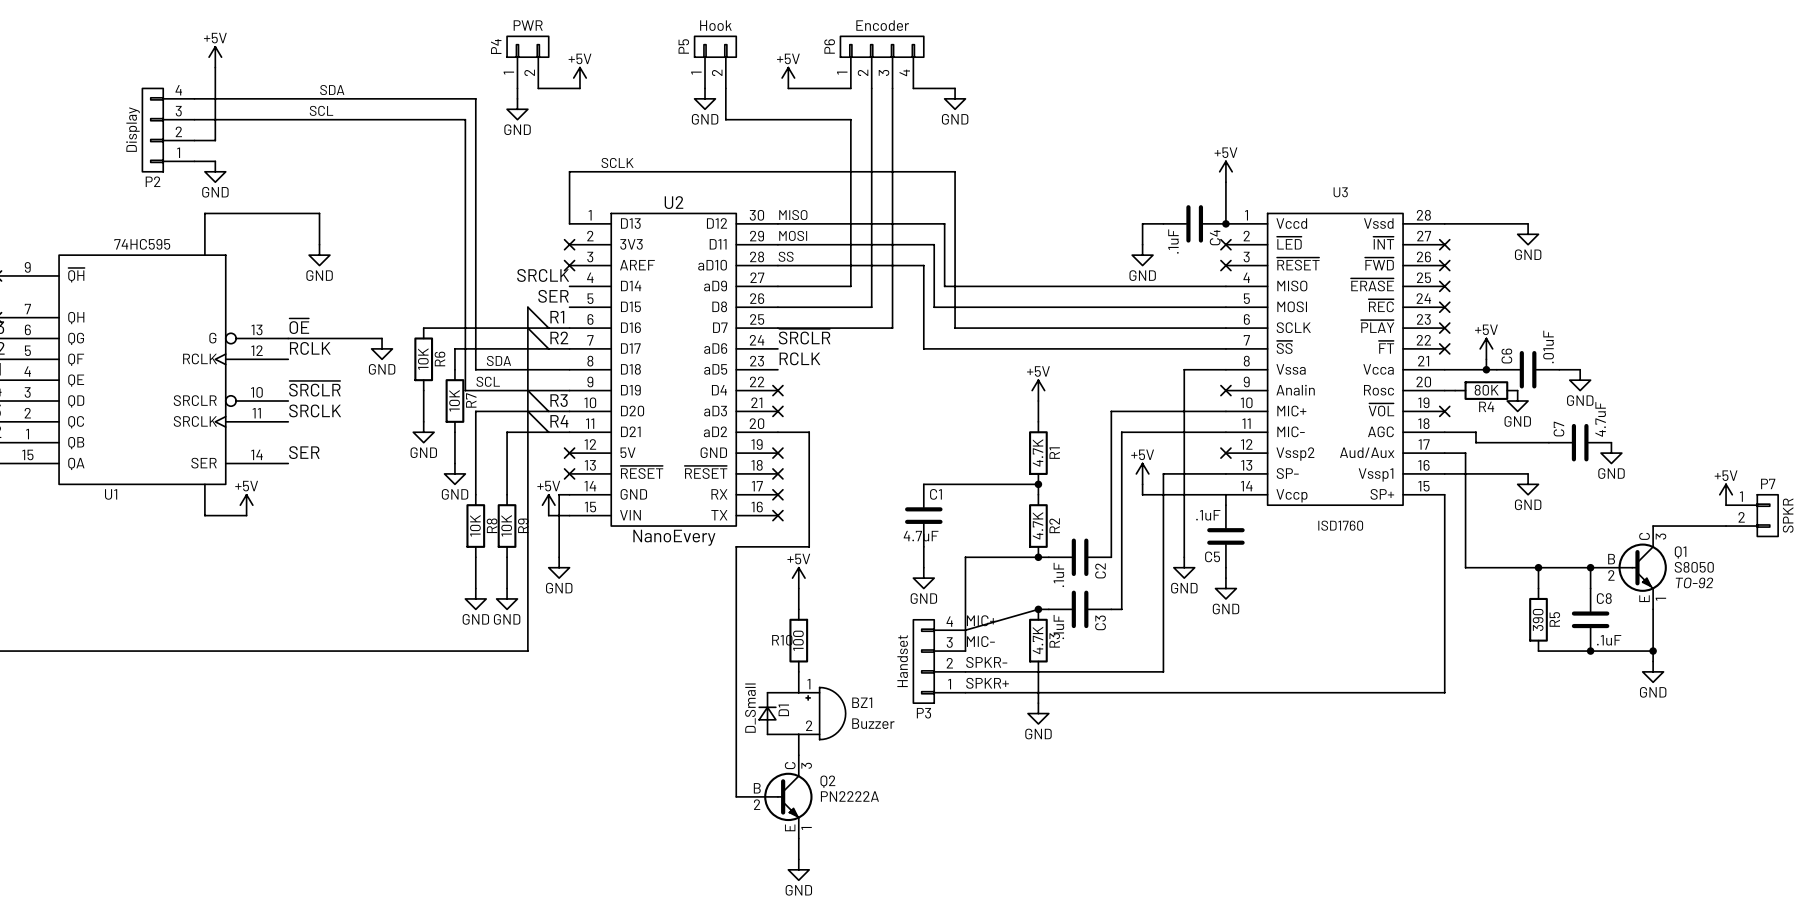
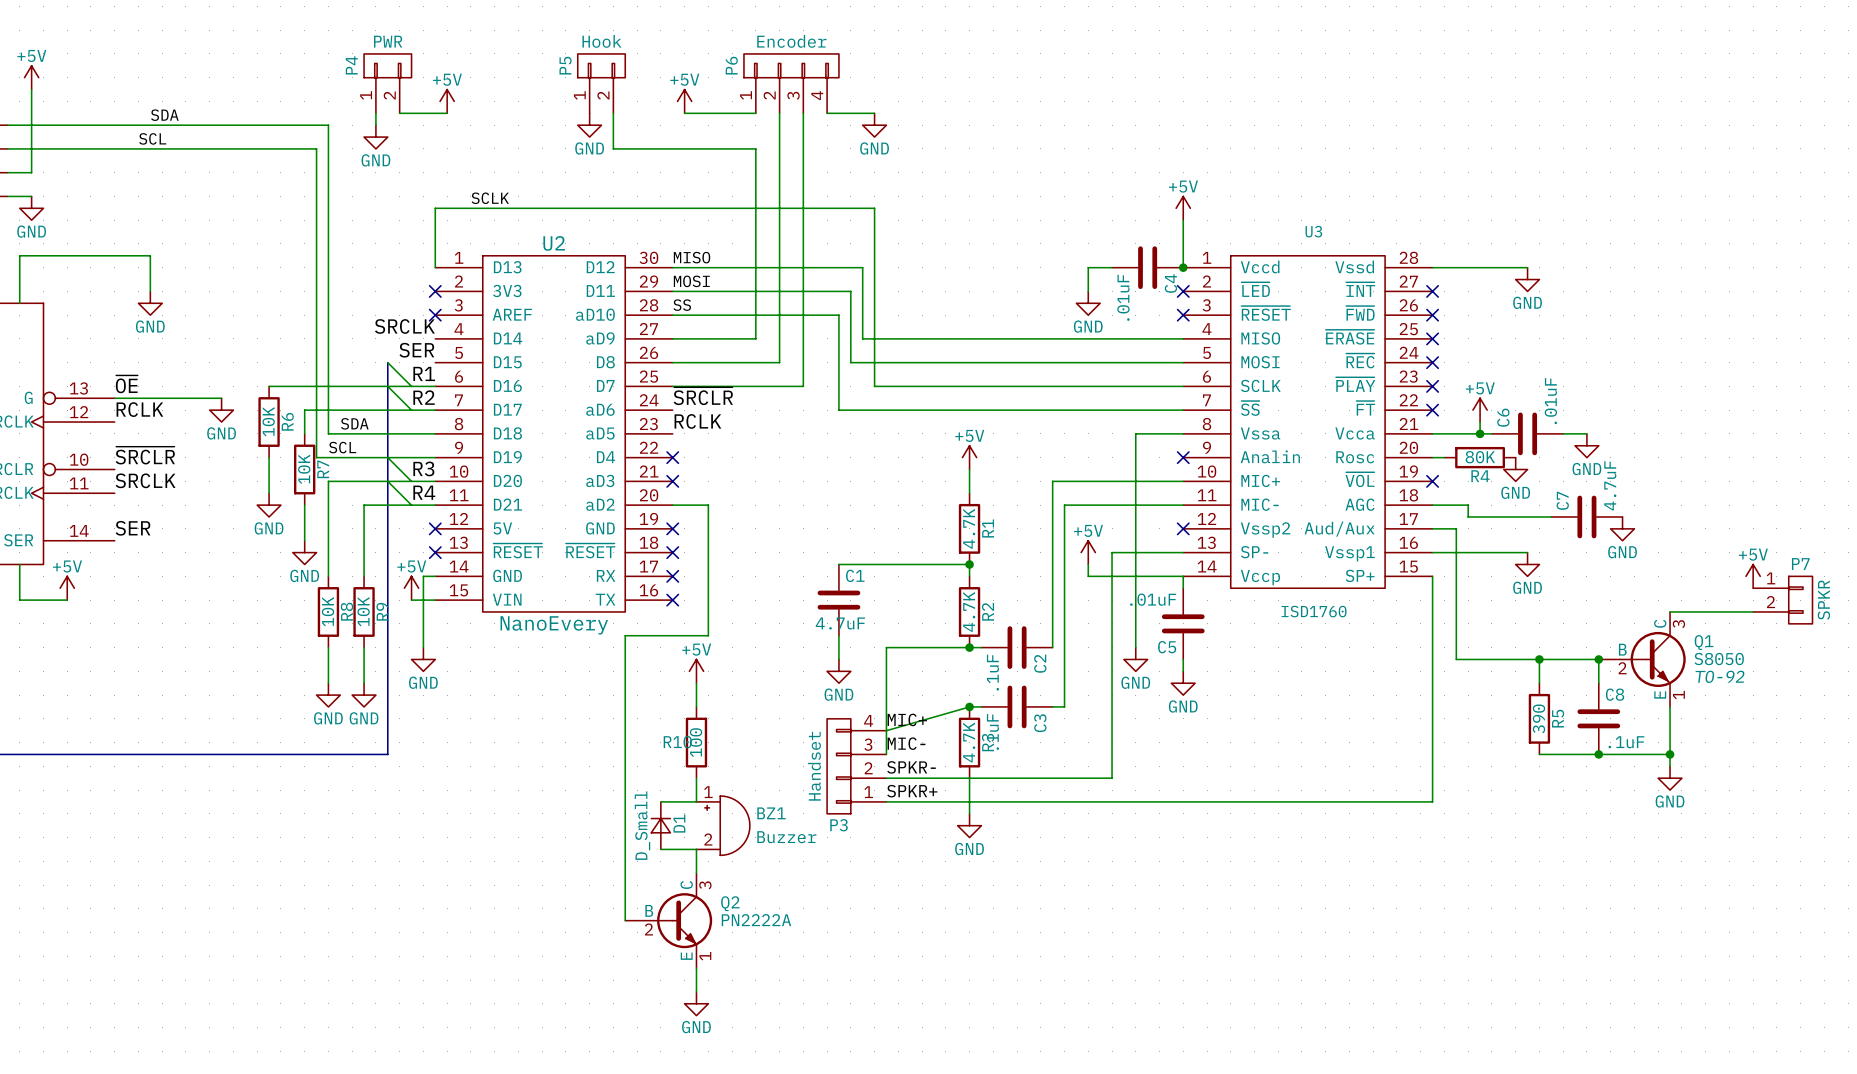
C4 value: .1uF (1173, 241) -> .01uF (1123, 297)
C5 value: .1uF (1208, 515) -> .01uF (1153, 599)

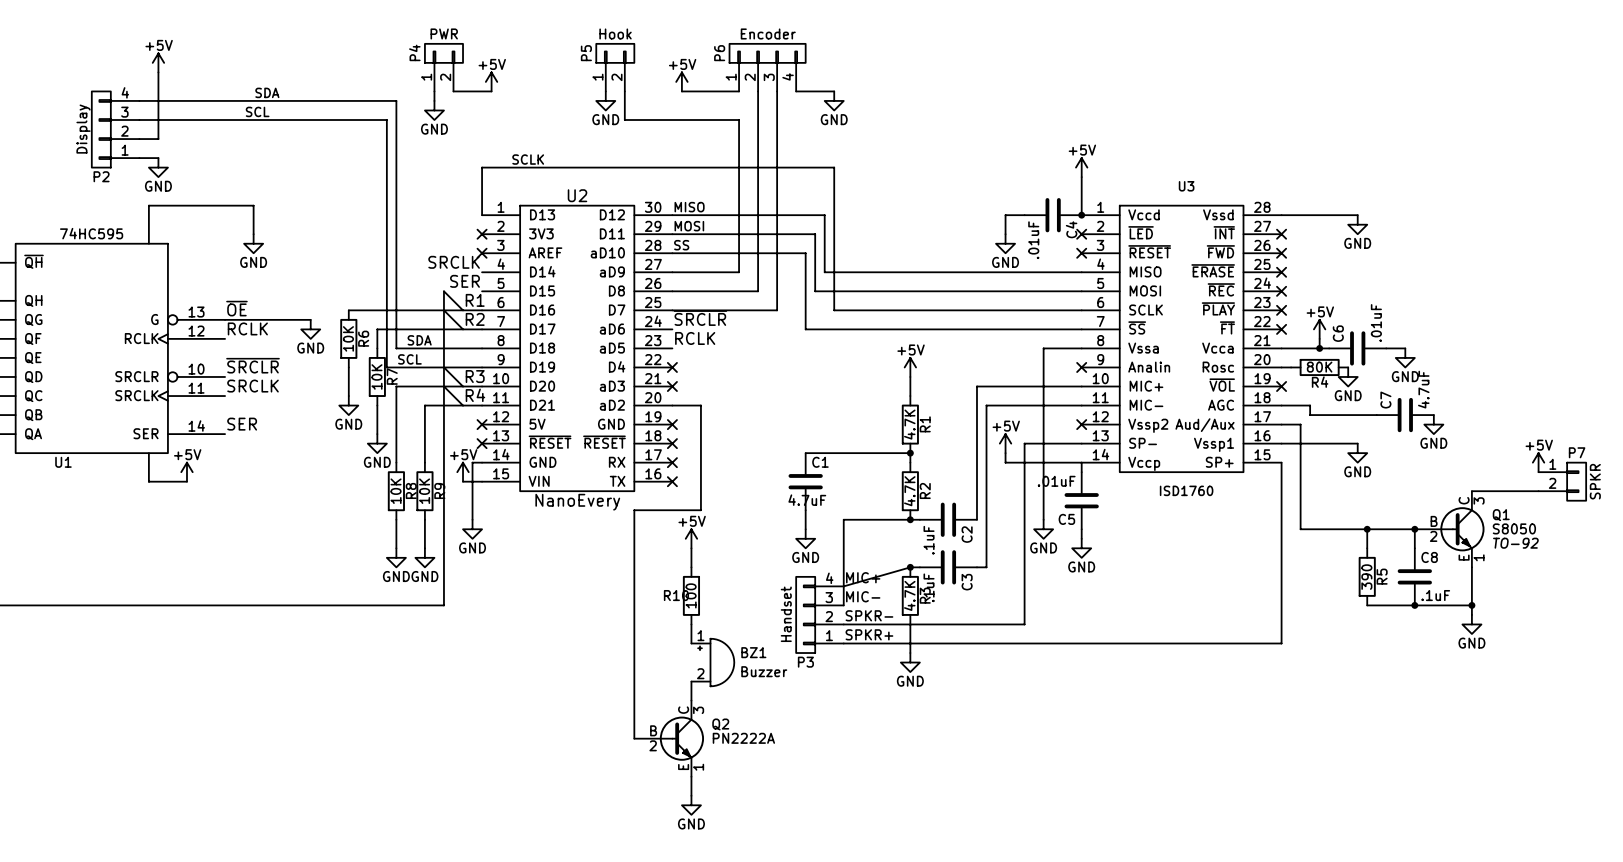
wire: (660, 801) (696, 801) -> none
D1: D_Small (660, 825) -> none
wire: (660, 849) (696, 849) -> none

